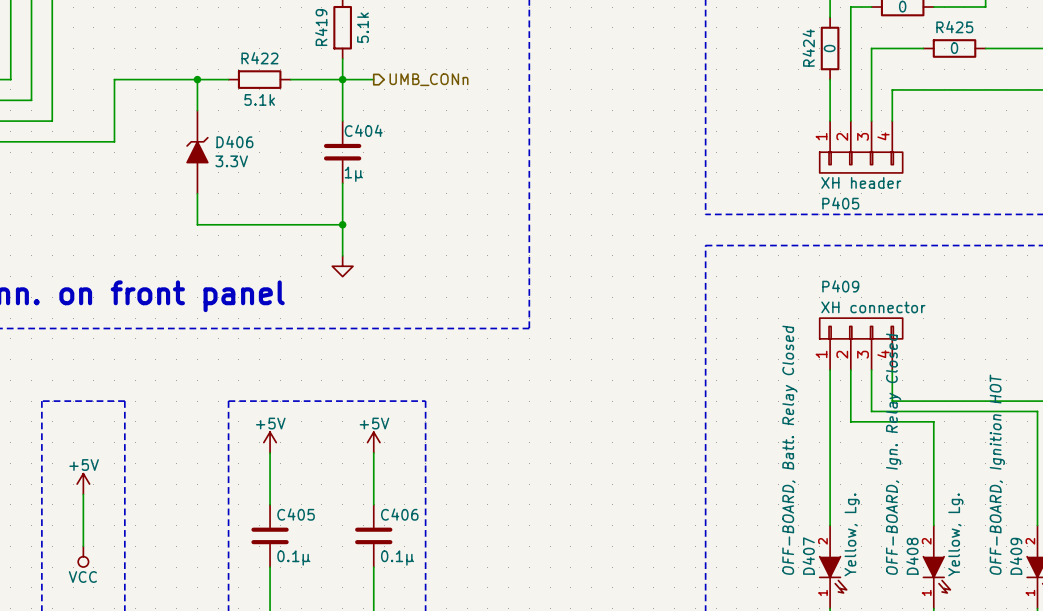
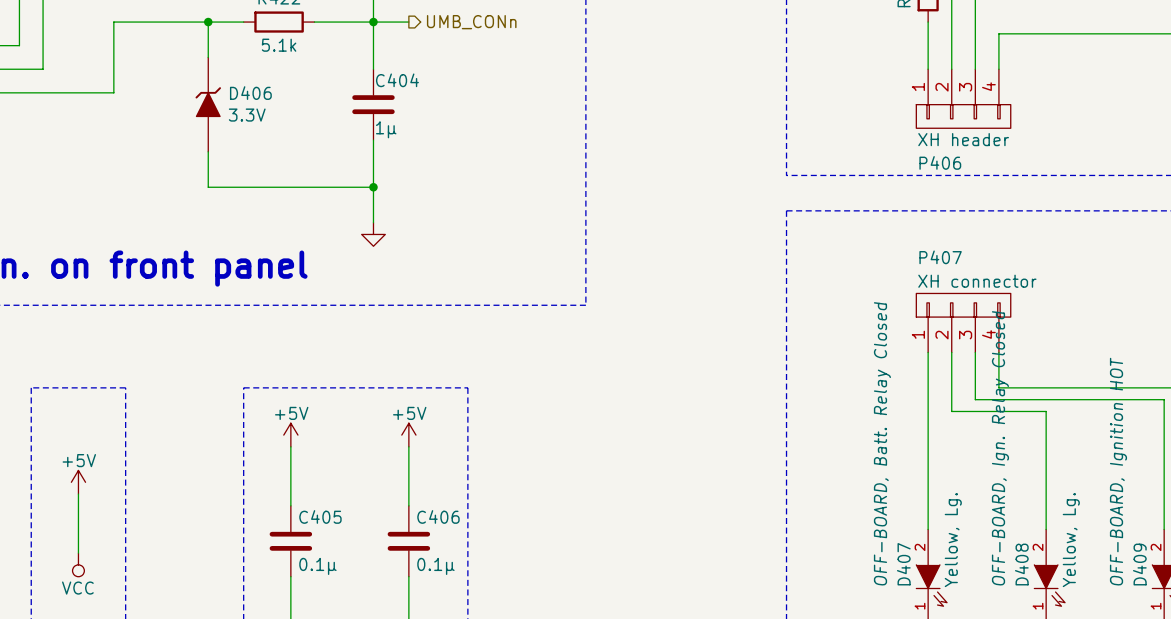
P405 name: P405 (840, 203) -> P406 (940, 162)
P409 name: P409 (840, 286) -> P407 (940, 257)

